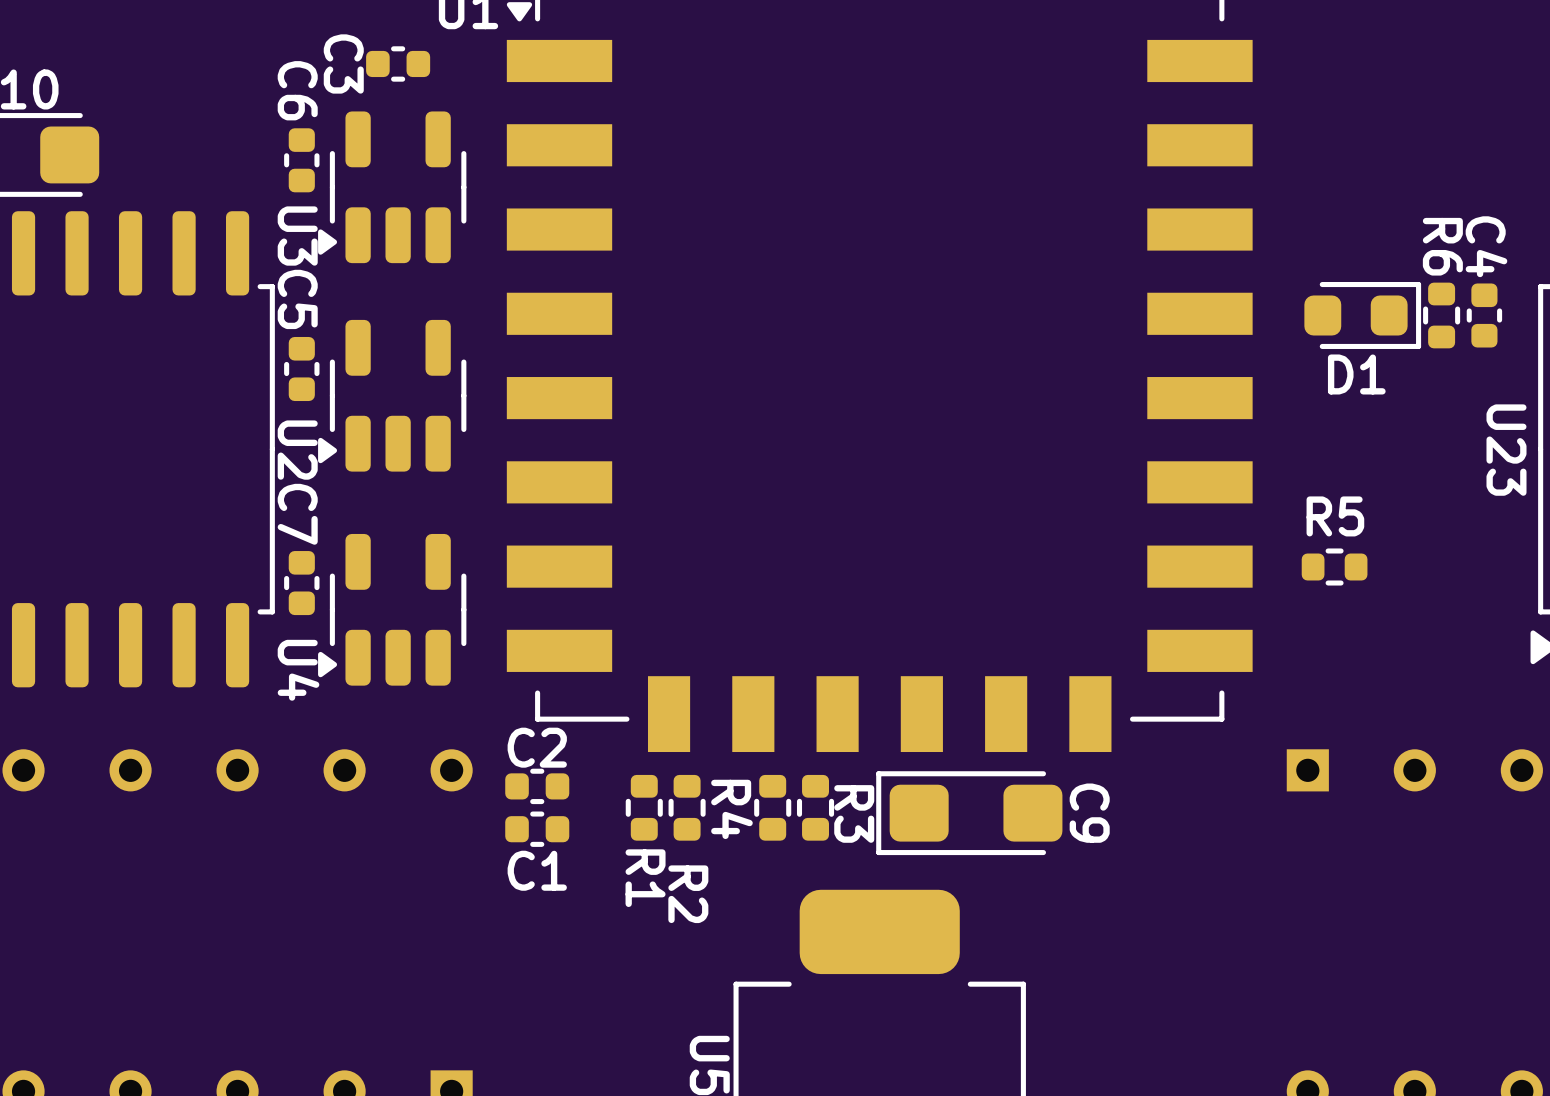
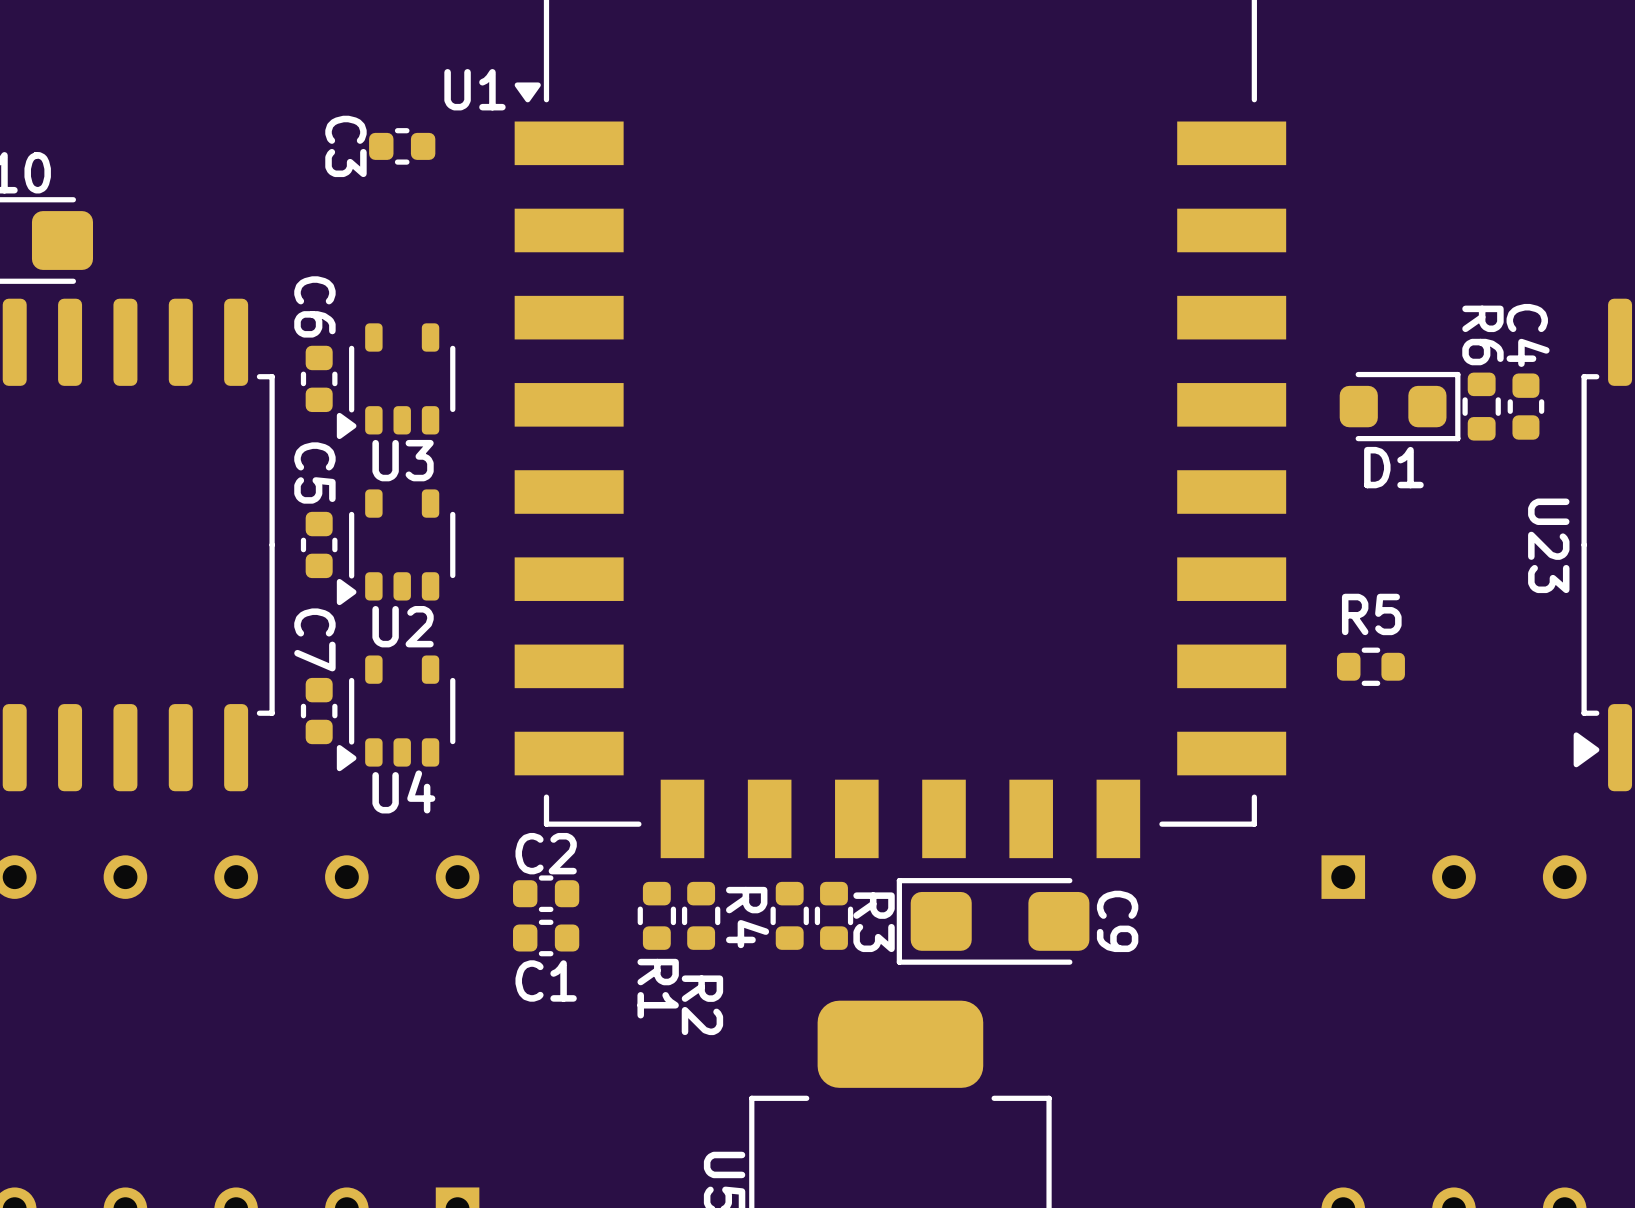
U3 footprint: [318, 111, 467, 264] -> [336, 323, 456, 440]
C6 position: (301, 160) -> (319, 378)
U3 name position: U3 (297, 236) -> U3 (403, 460)
U2 footprint: [318, 319, 467, 472] -> [336, 489, 456, 606]
C5 position: (301, 369) -> (319, 544)
U2 name position: U2 (297, 450) -> U2 (403, 626)
U4 footprint: [318, 533, 467, 686] -> [336, 655, 456, 772]
C7 position: (301, 583) -> (319, 711)
U4 name rotation: 0° (298, 670) -> 90° counterclockwise (403, 791)
U4 name position: U4 (298, 670) -> U4 (403, 791)

